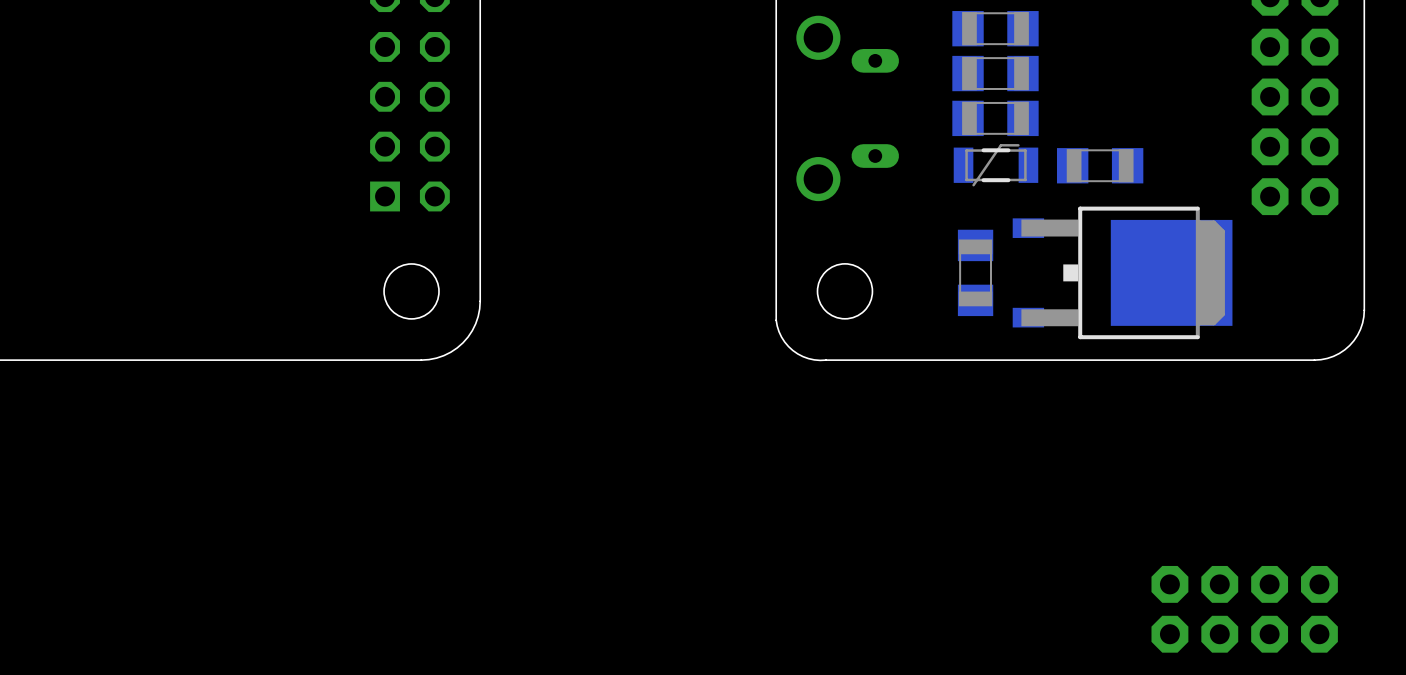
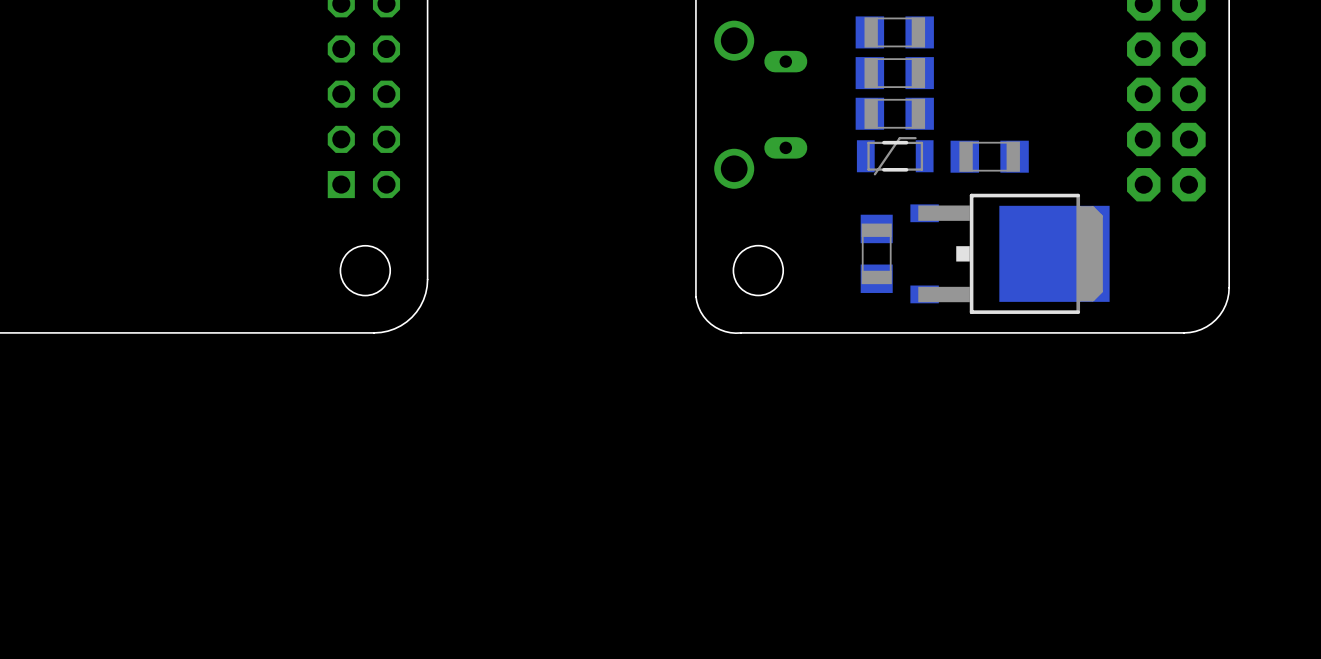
part: (1244, 609) -> none

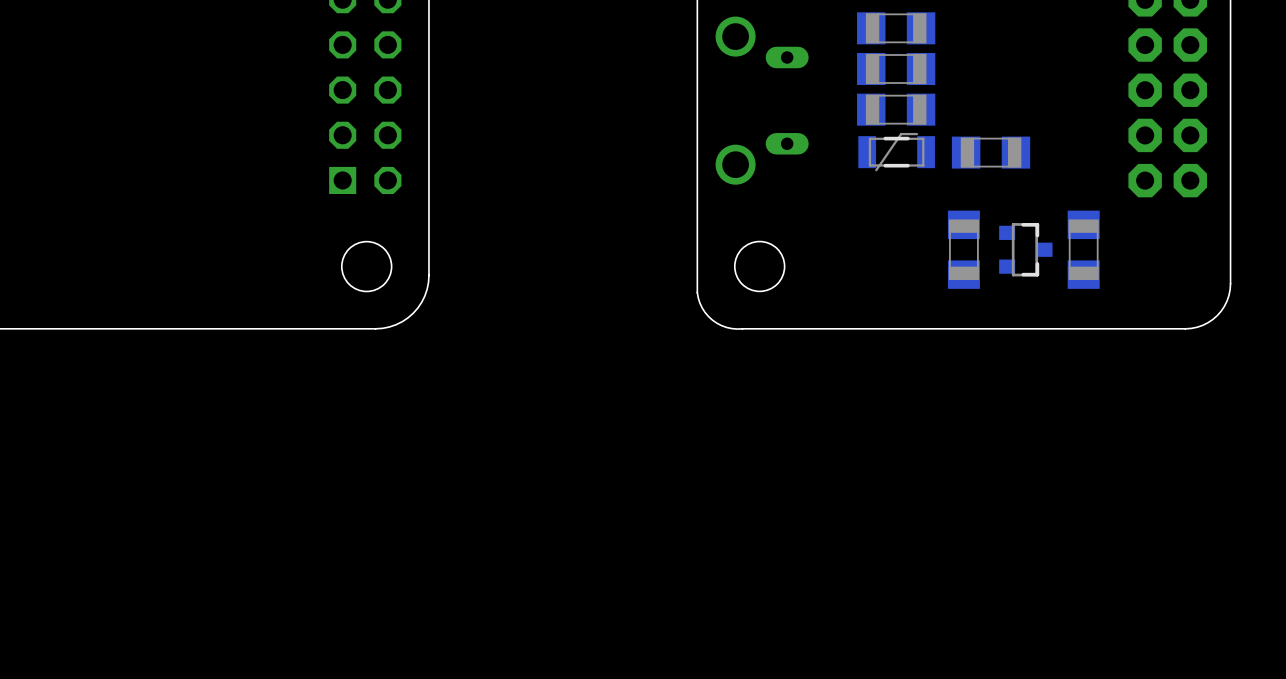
part footprint: [910, 193, 1110, 314] -> [999, 223, 1053, 277]
part position: (876, 253) -> (963, 249)
part: none -> (1083, 249)

